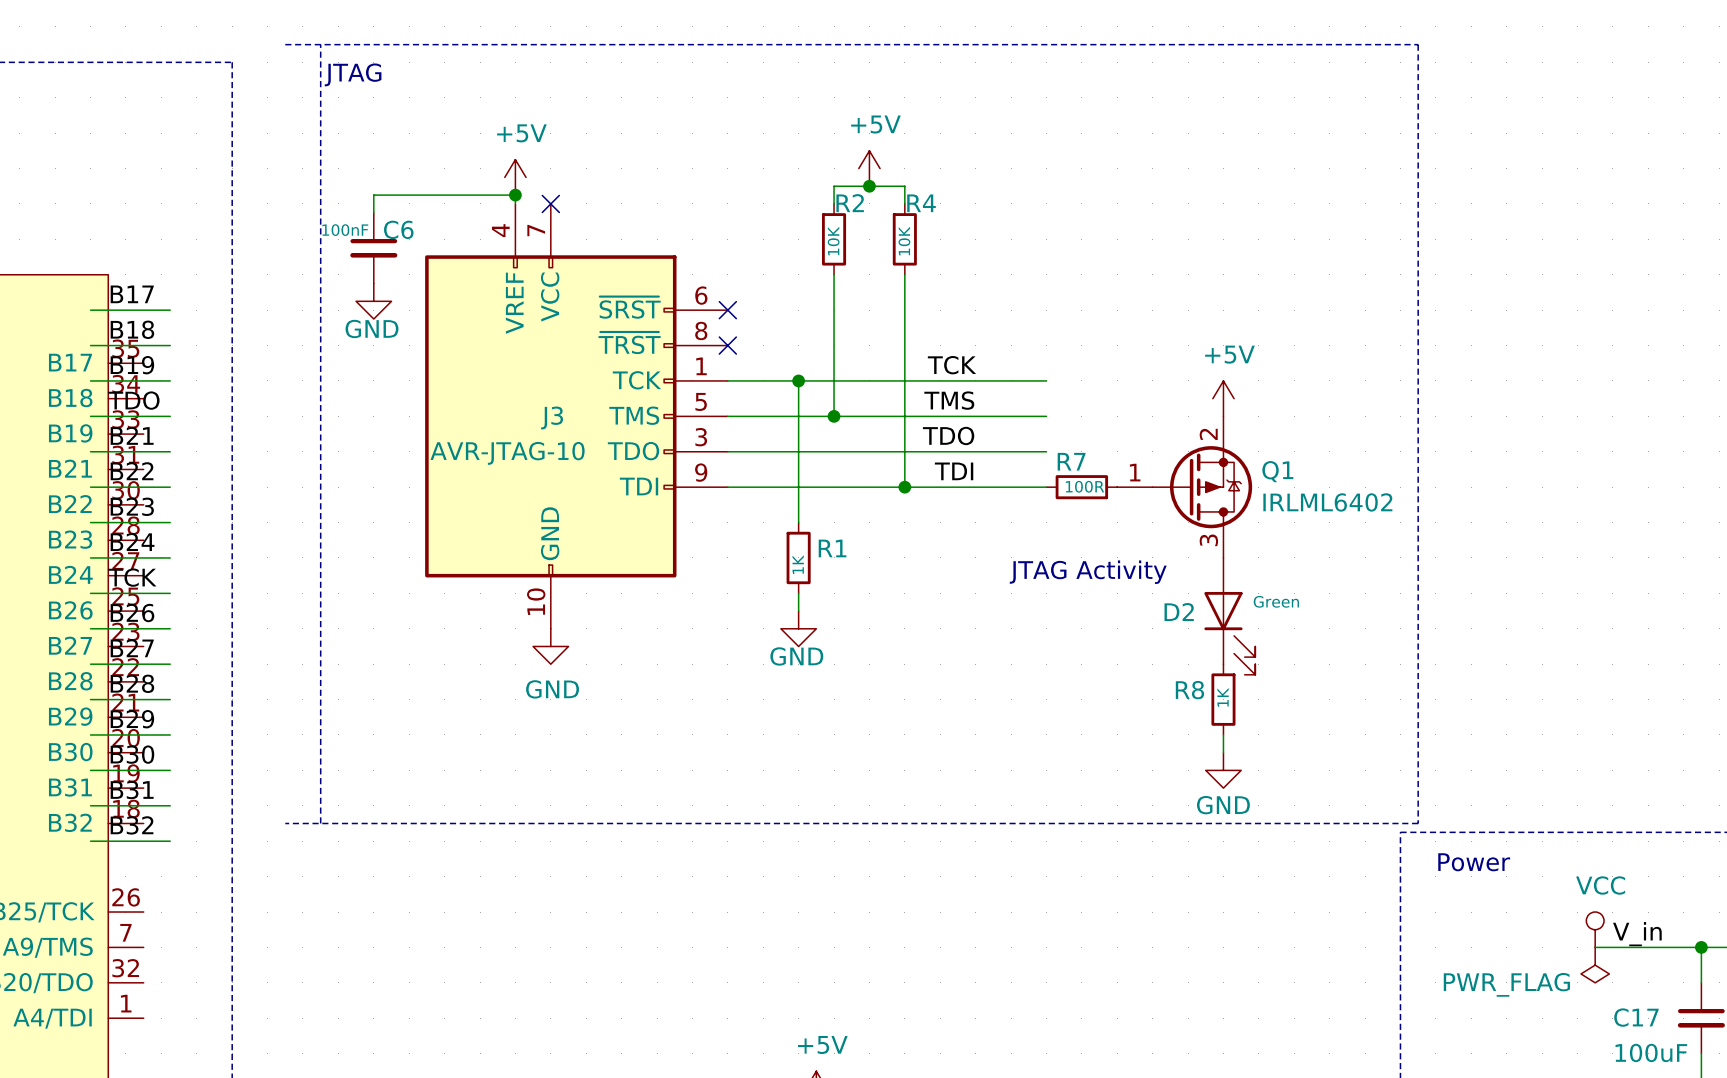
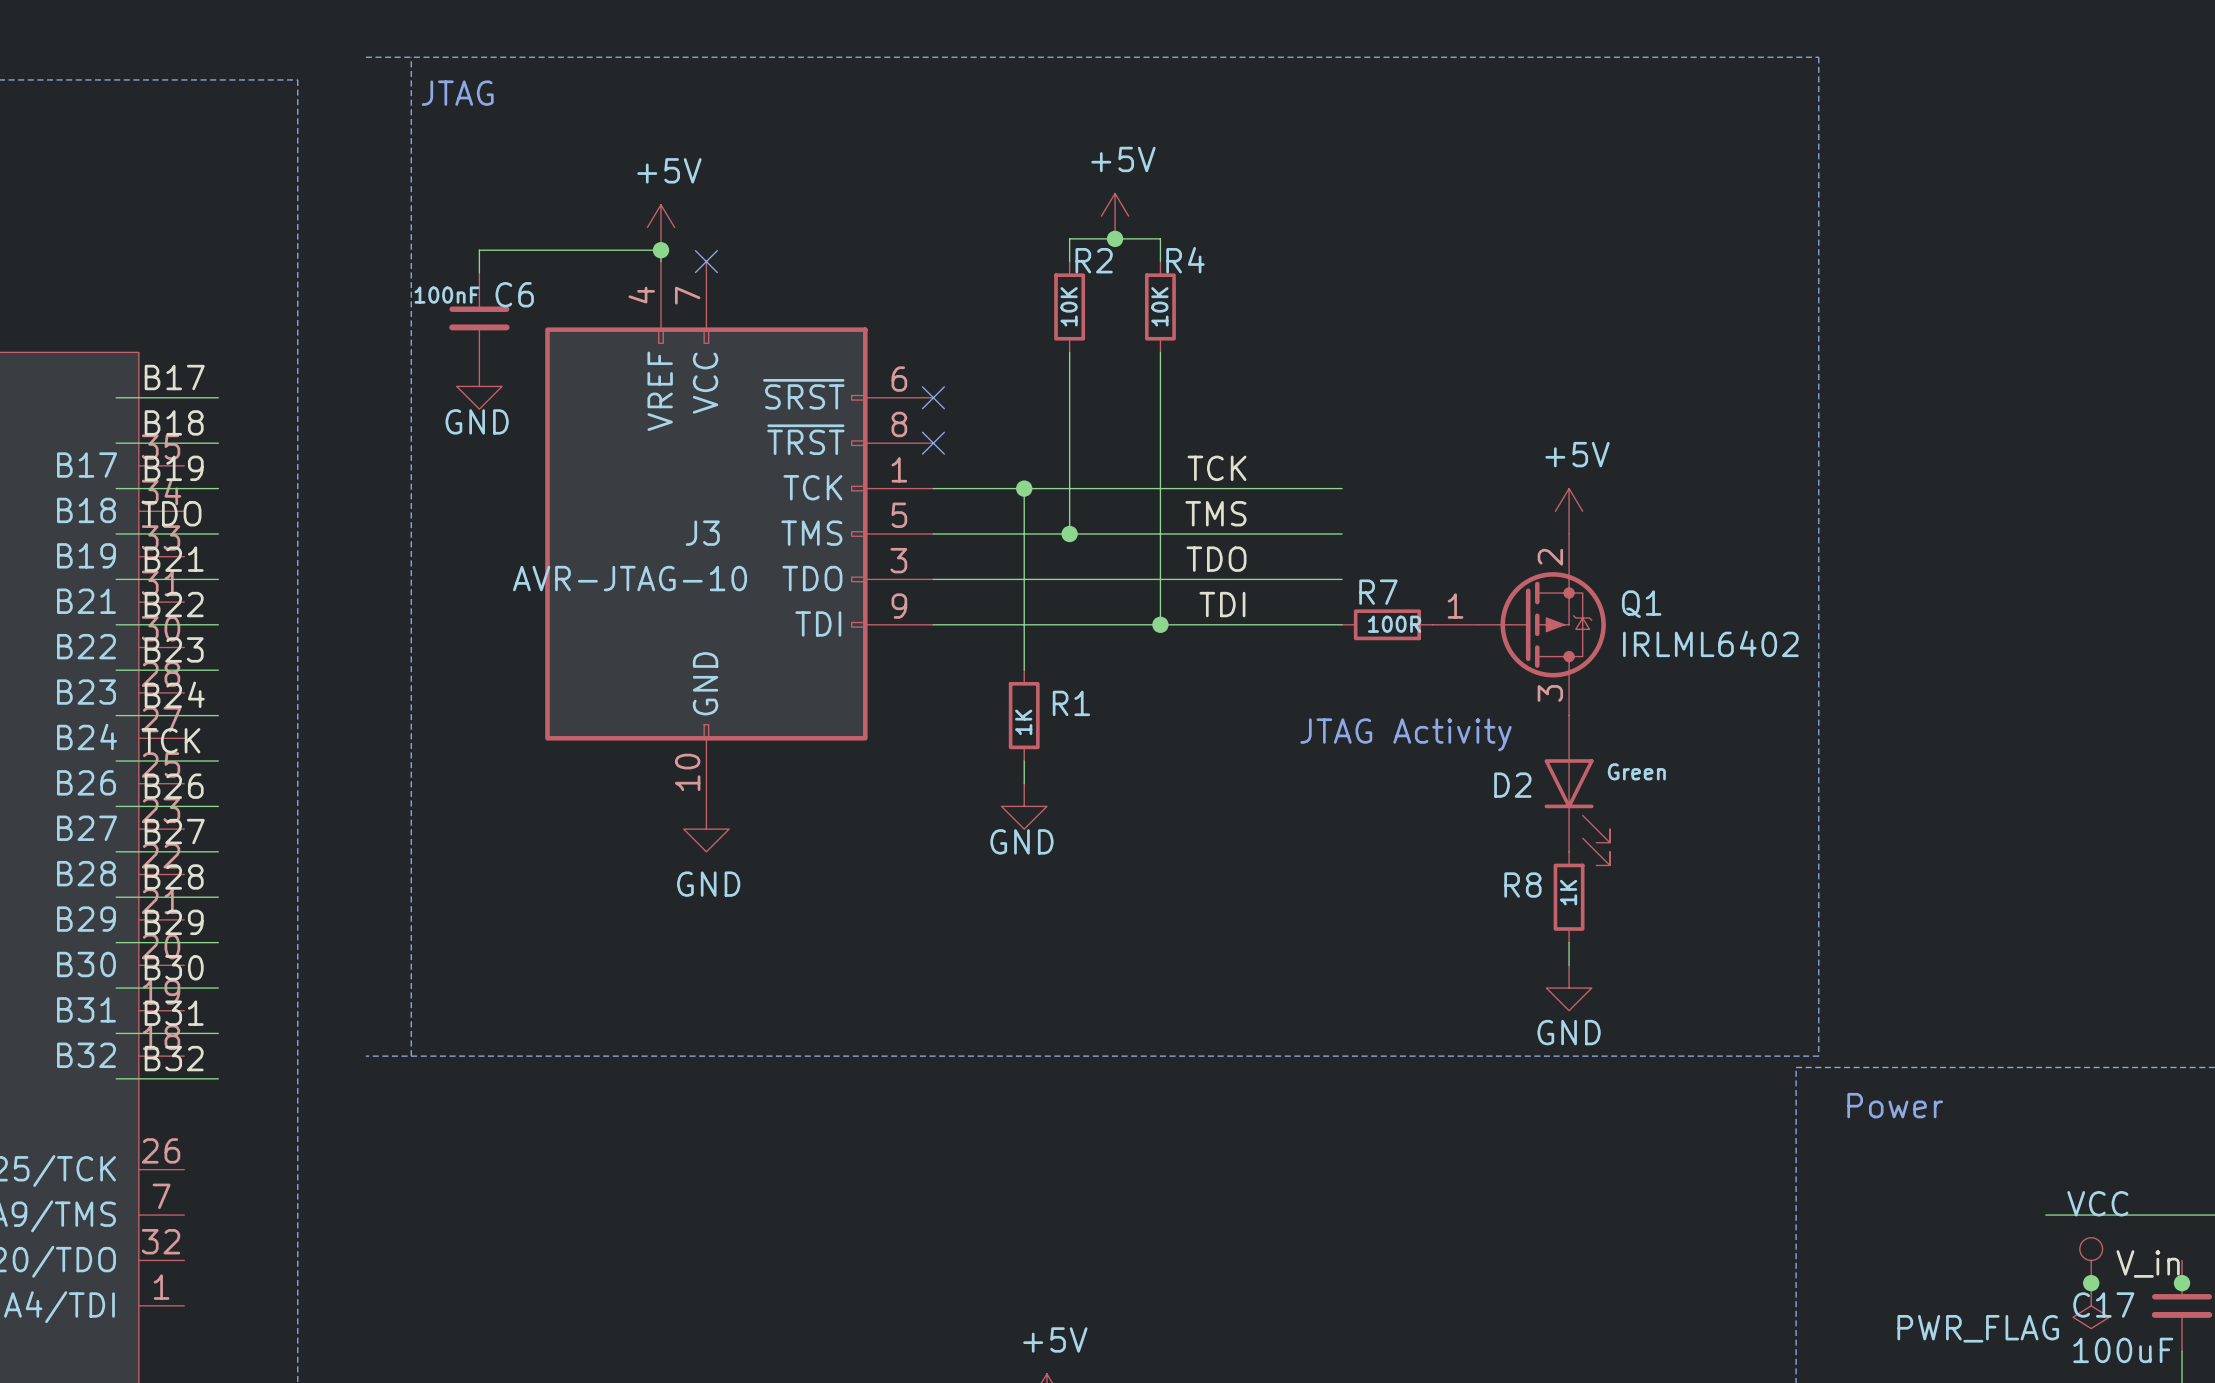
power symbol position: VCC (1595, 929) -> VCC (2091, 1260)
label position: V_in (1637, 934) -> V_in (2148, 1263)
wire: (1701, 947) (1701, 982) -> none
junction: (1701, 947) -> none
power symbol position: PWR_FLAG (1595, 965) -> PWR_FLAG (2091, 1305)
junction: none -> (2091, 1283)
junction: none -> (2182, 1283)

